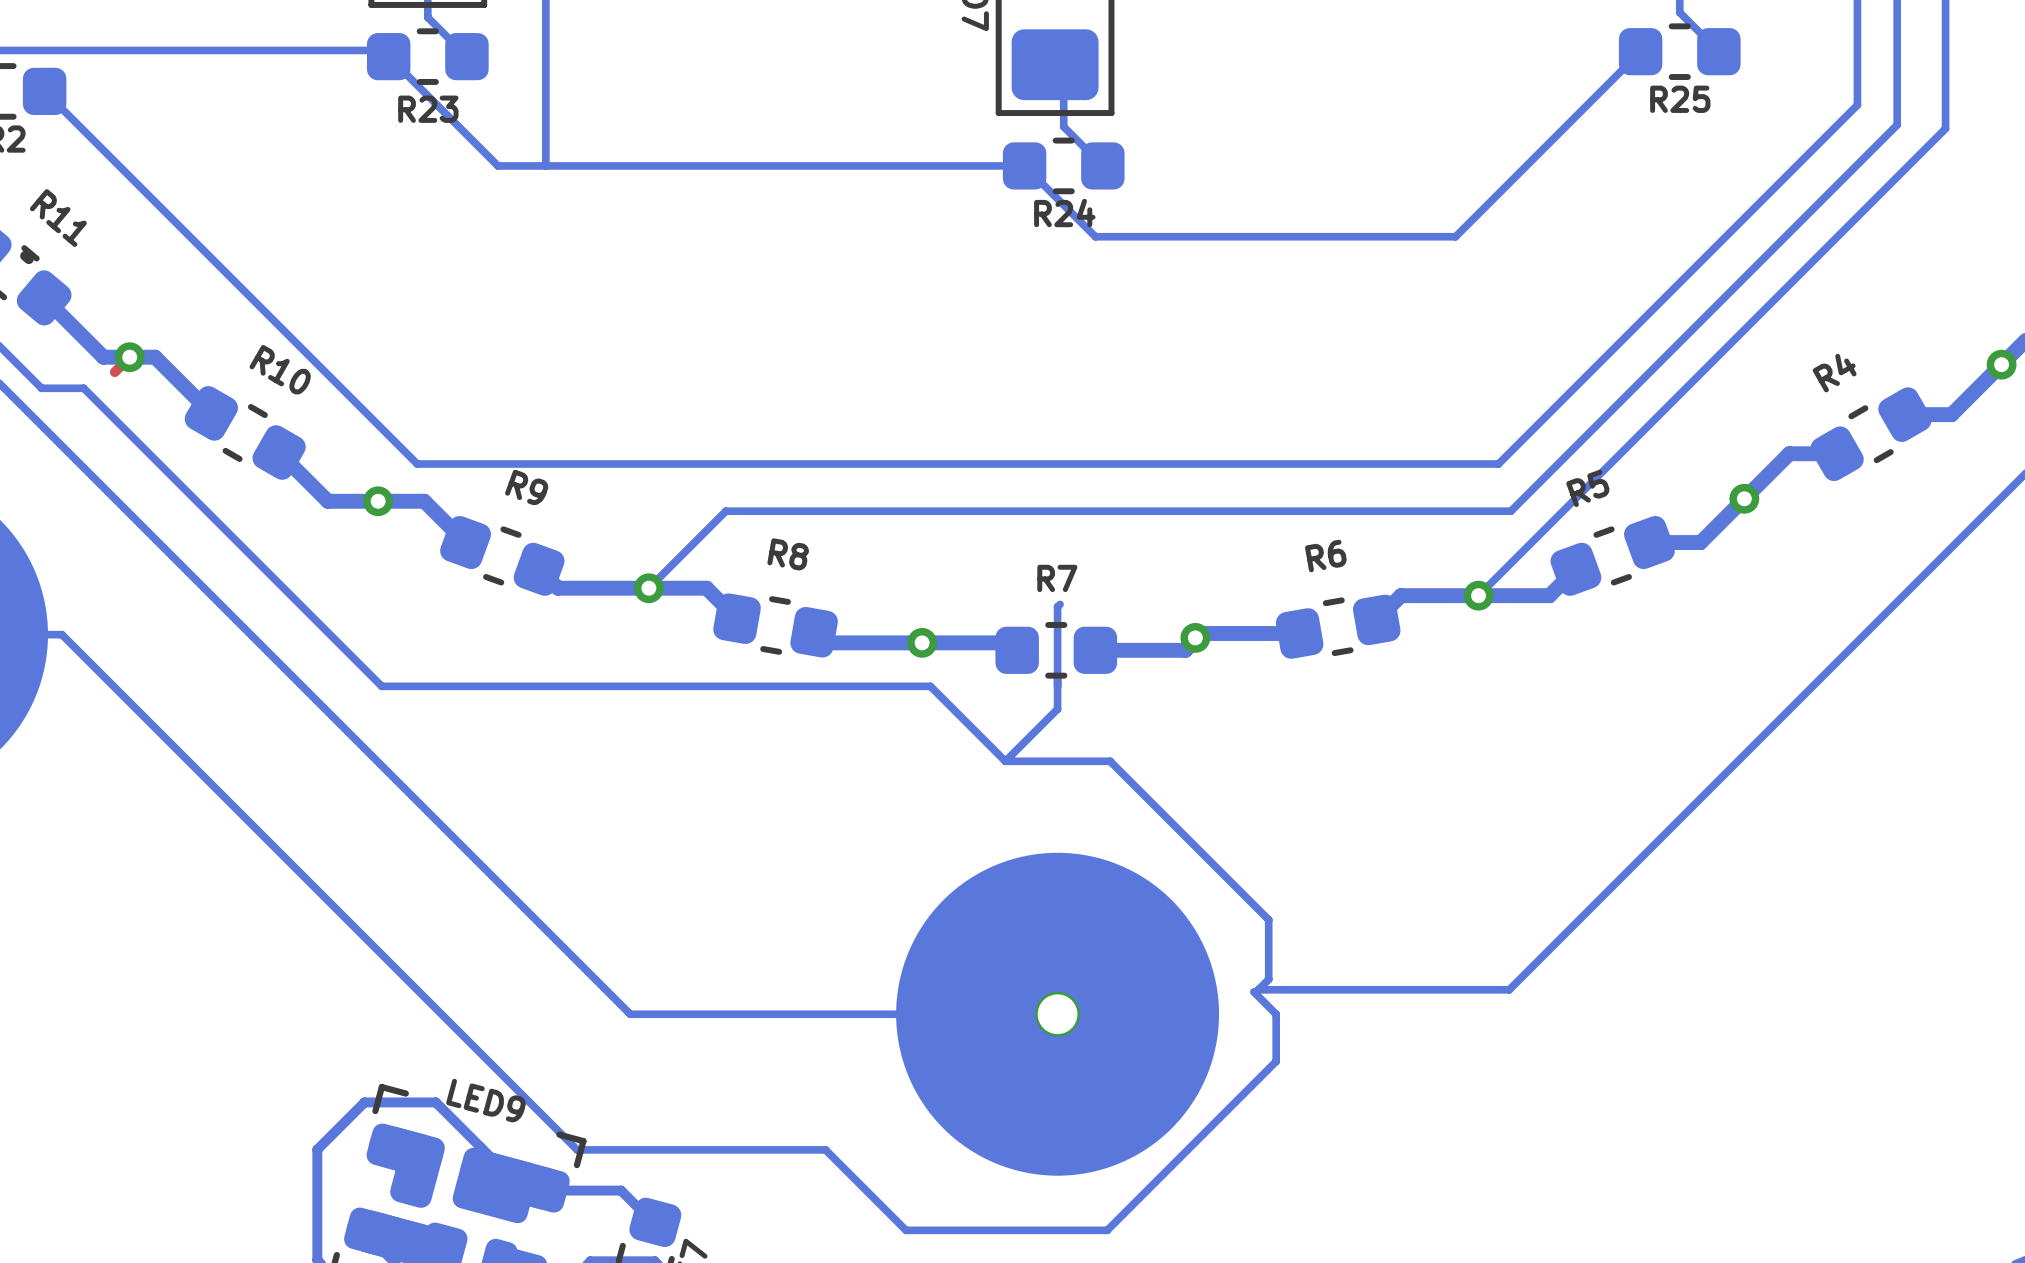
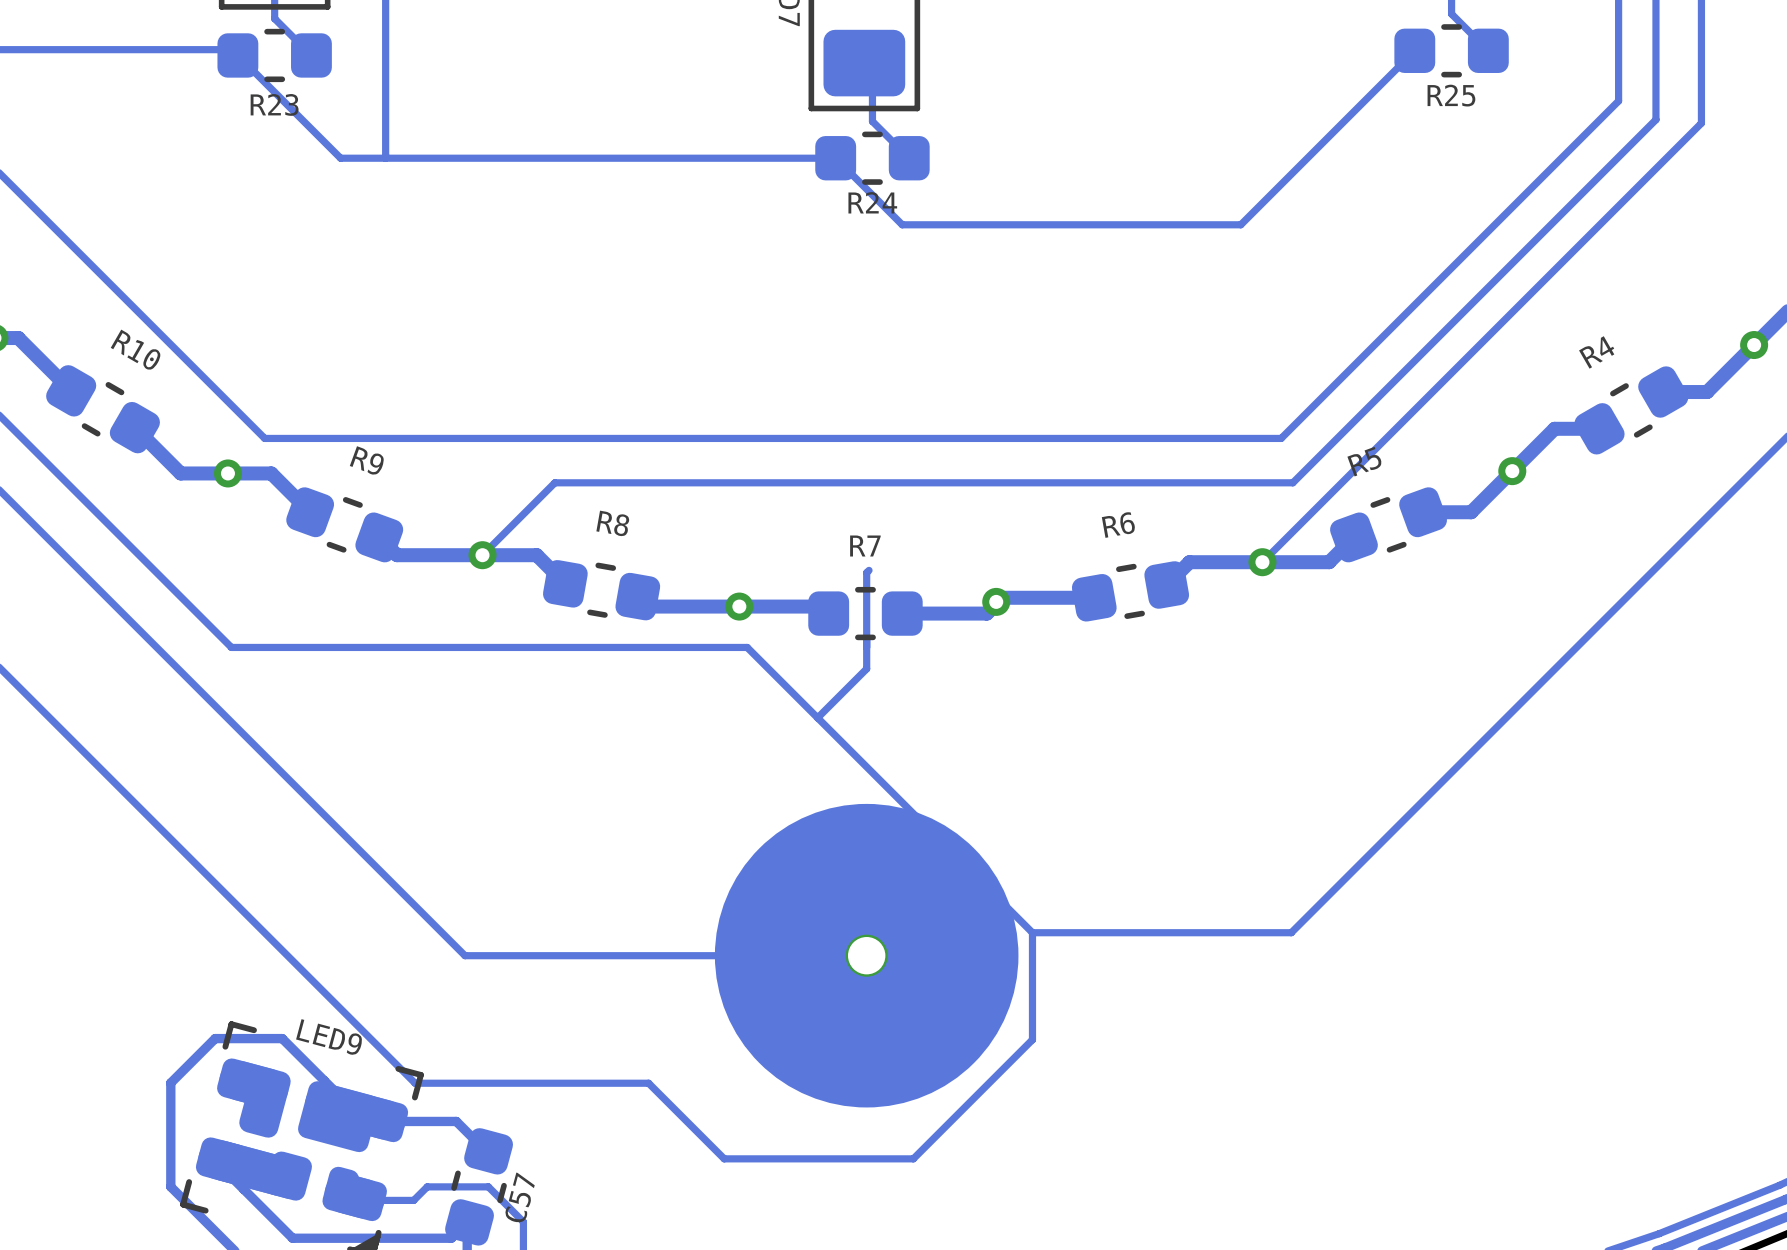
bottom track: (1005, 761) (1110, 761) (1268, 919) (1268, 979) (1258, 989) -> (817, 717) (1032, 932)
bottom track: none -> (1055, 932) (1032, 932)
bottom track: (1253, 991) (1276, 1014) (1276, 1061) (1233, 1103) -> (1032, 932) (1032, 1039)

